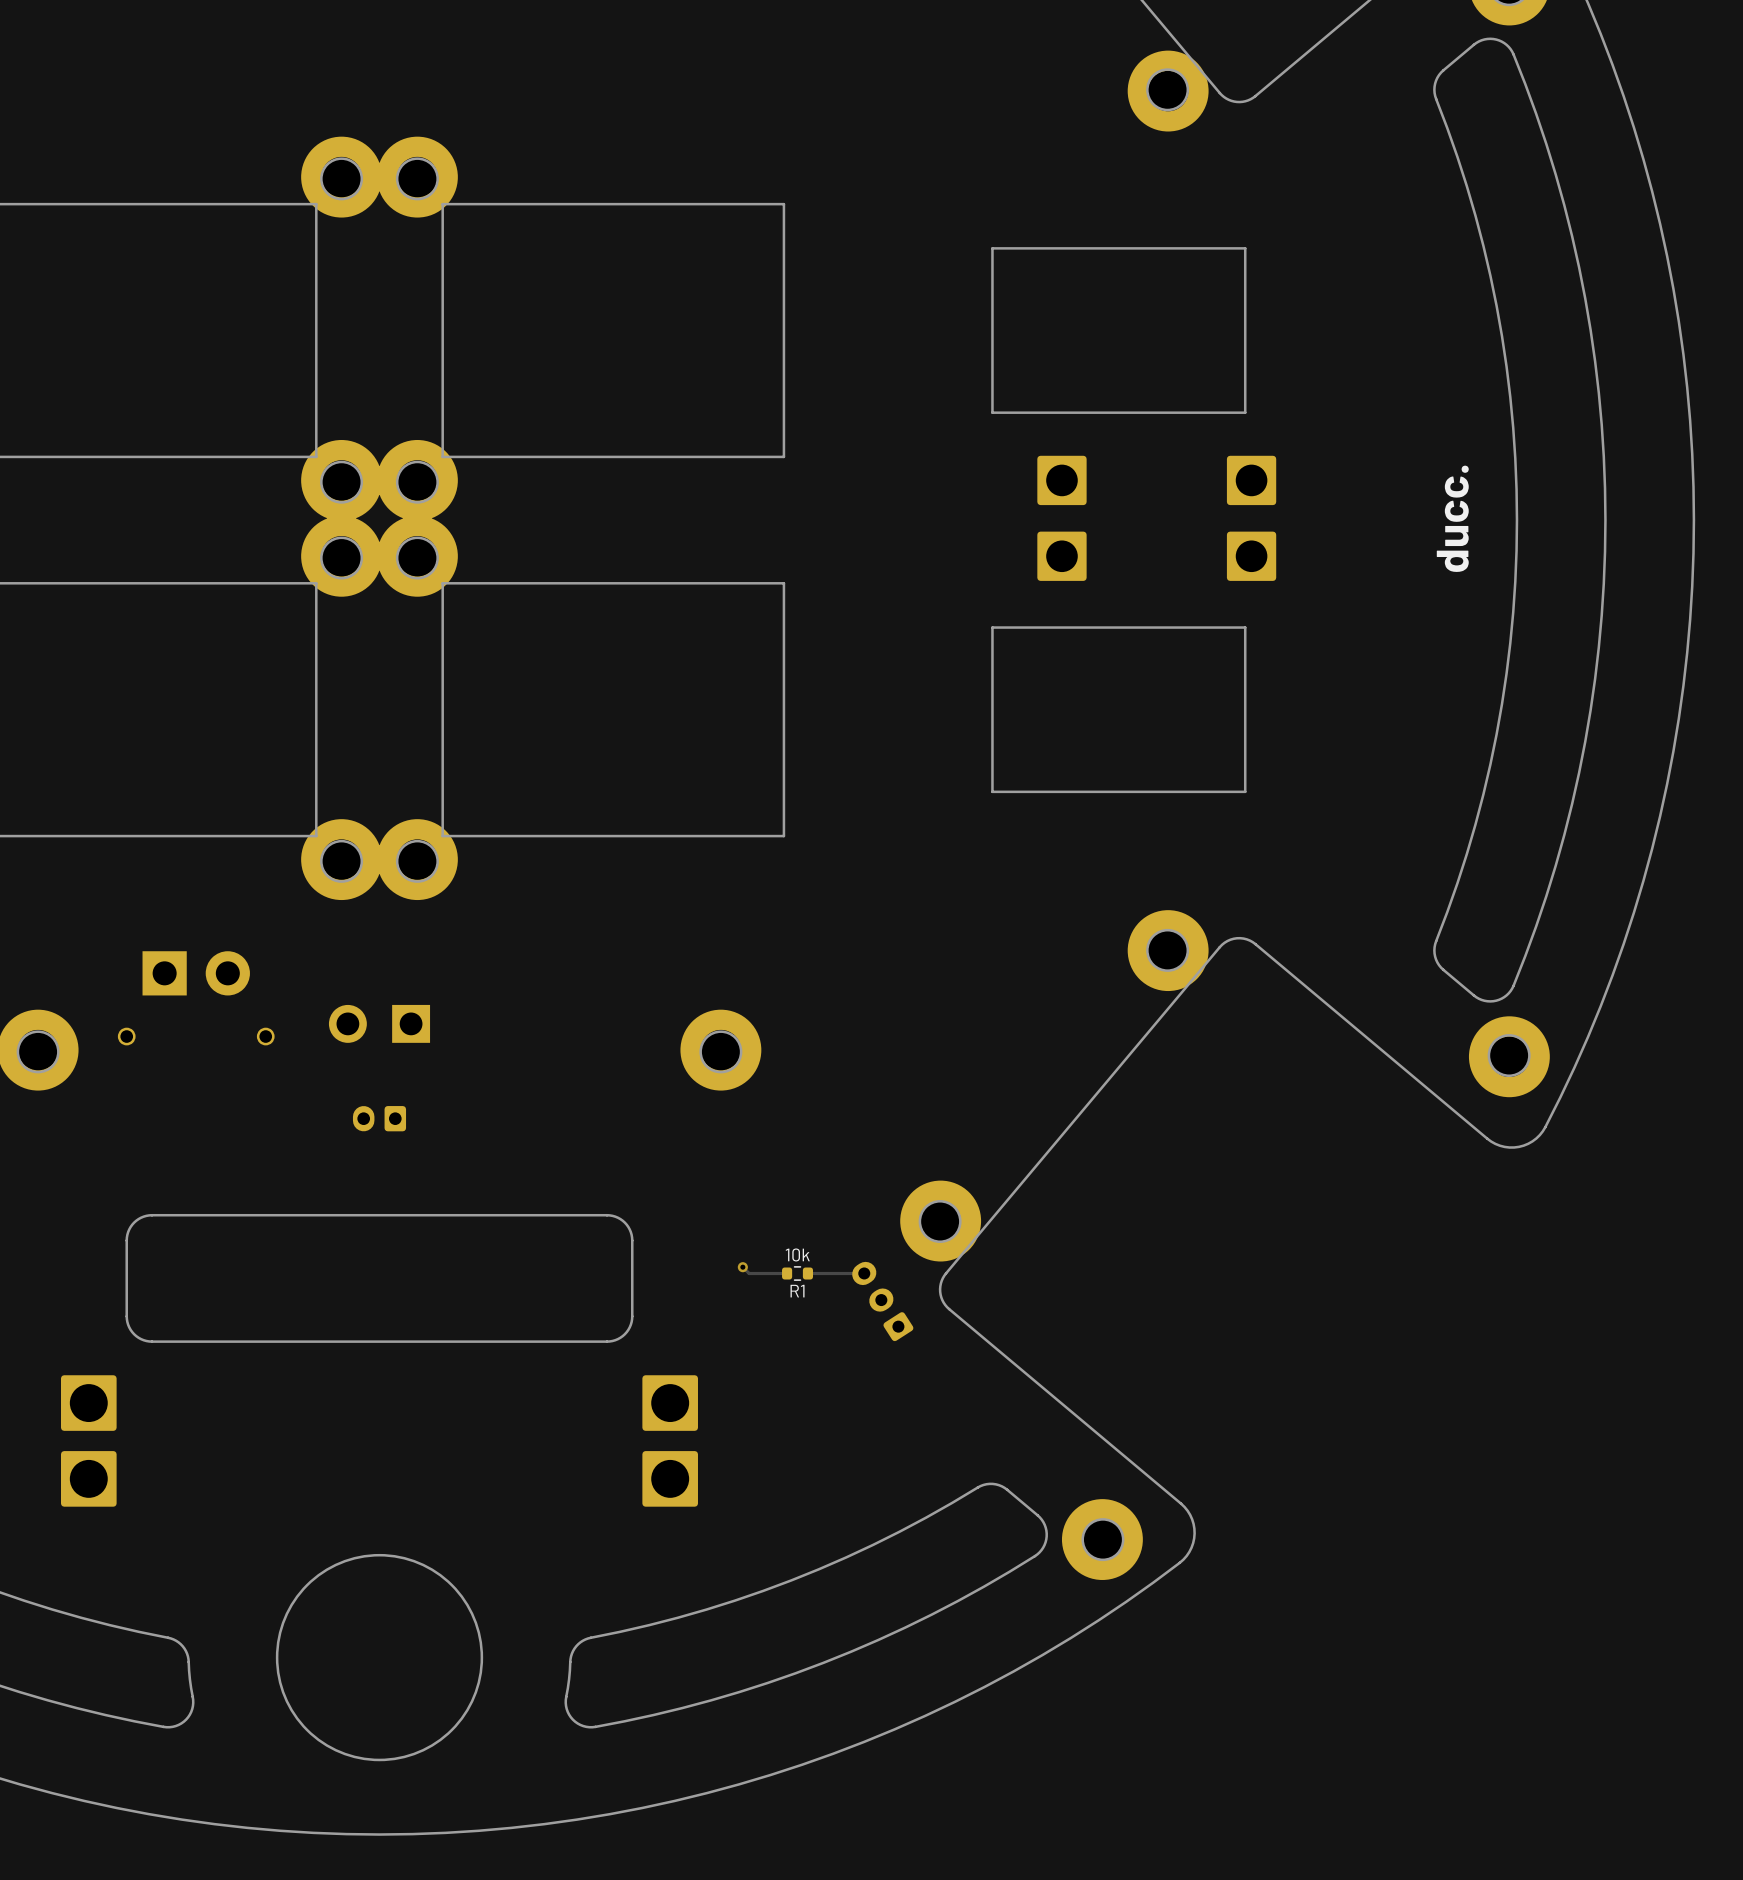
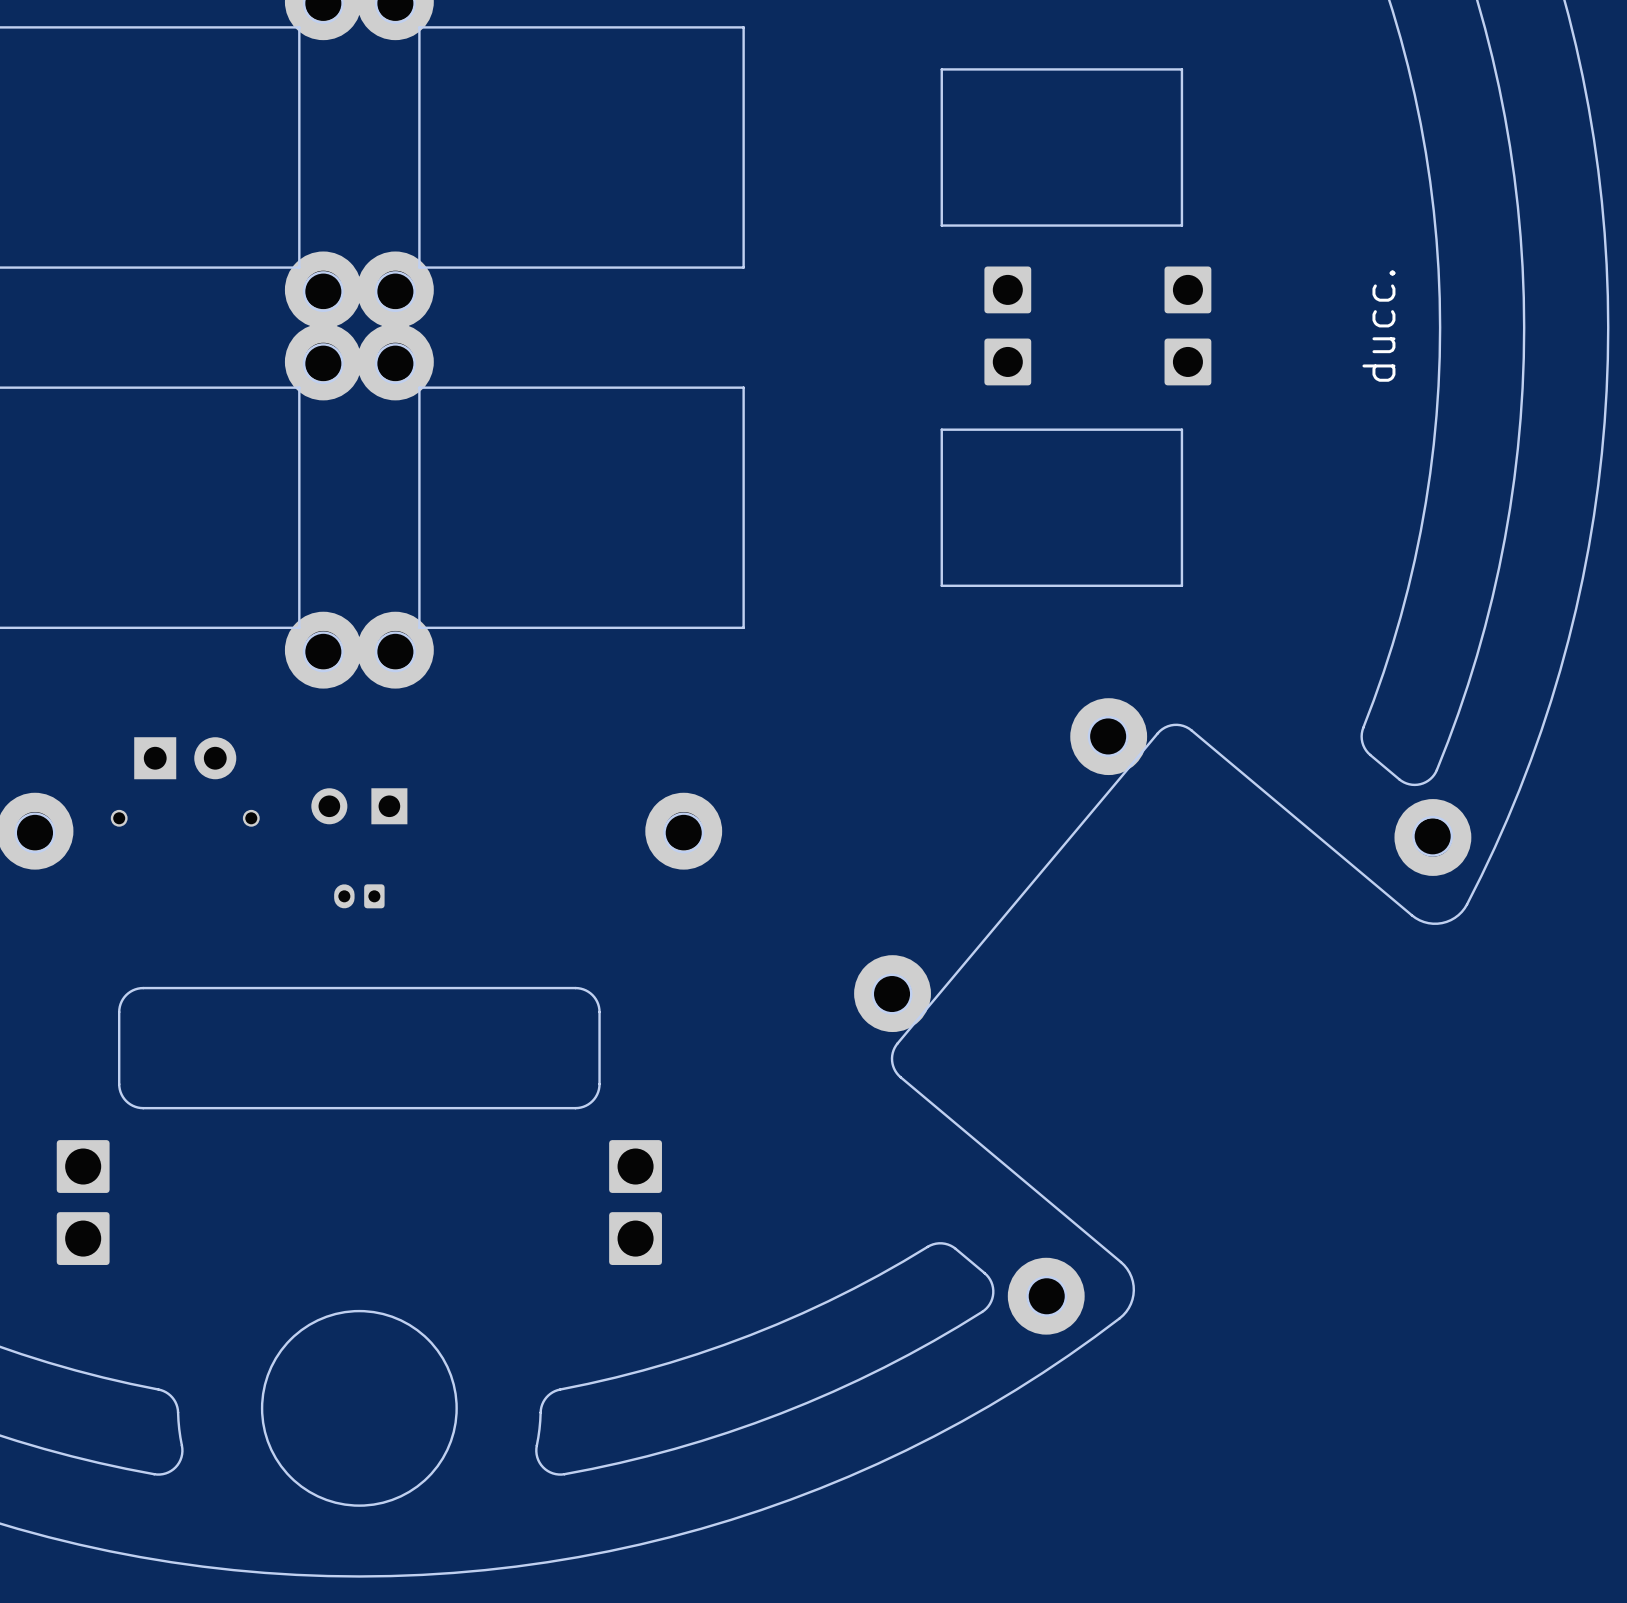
track: (742, 1267) (749, 1273) (787, 1273) -> none
via: (742, 1267) -> none
R1: 10k (797, 1273) -> none
track: (864, 1273) (807, 1273) -> none
part: (882, 1301) -> none

